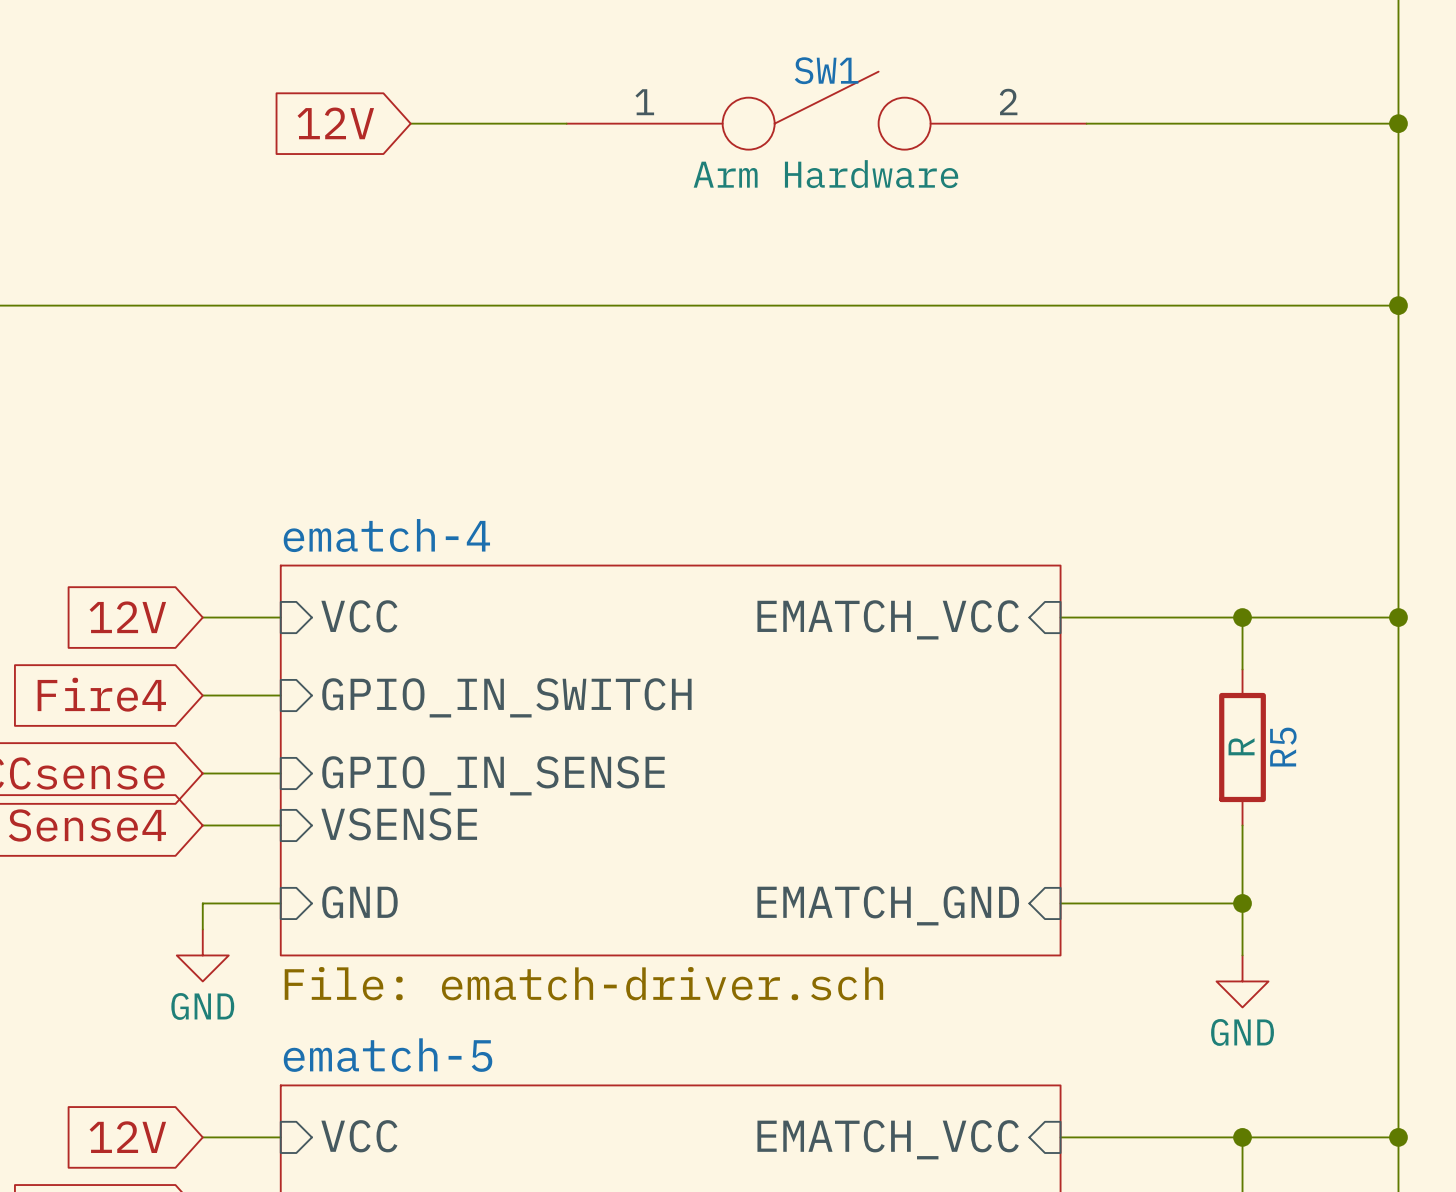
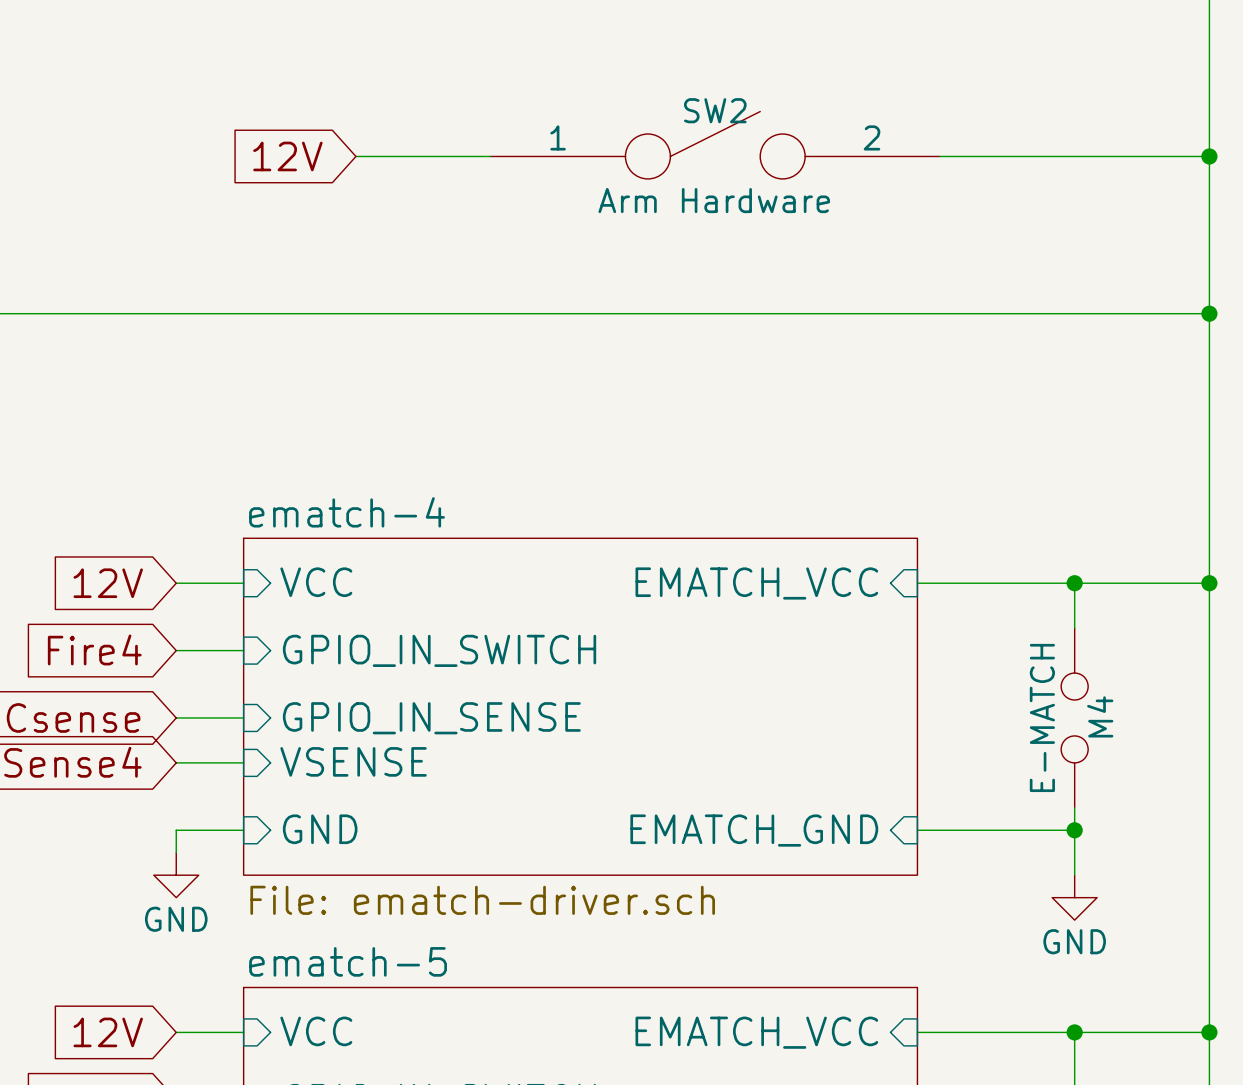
SW1 name: SW1 (826, 70) -> SW2 (715, 110)
R5: R (1242, 747) -> none
M4: none -> E-MATCH (1074, 717)

